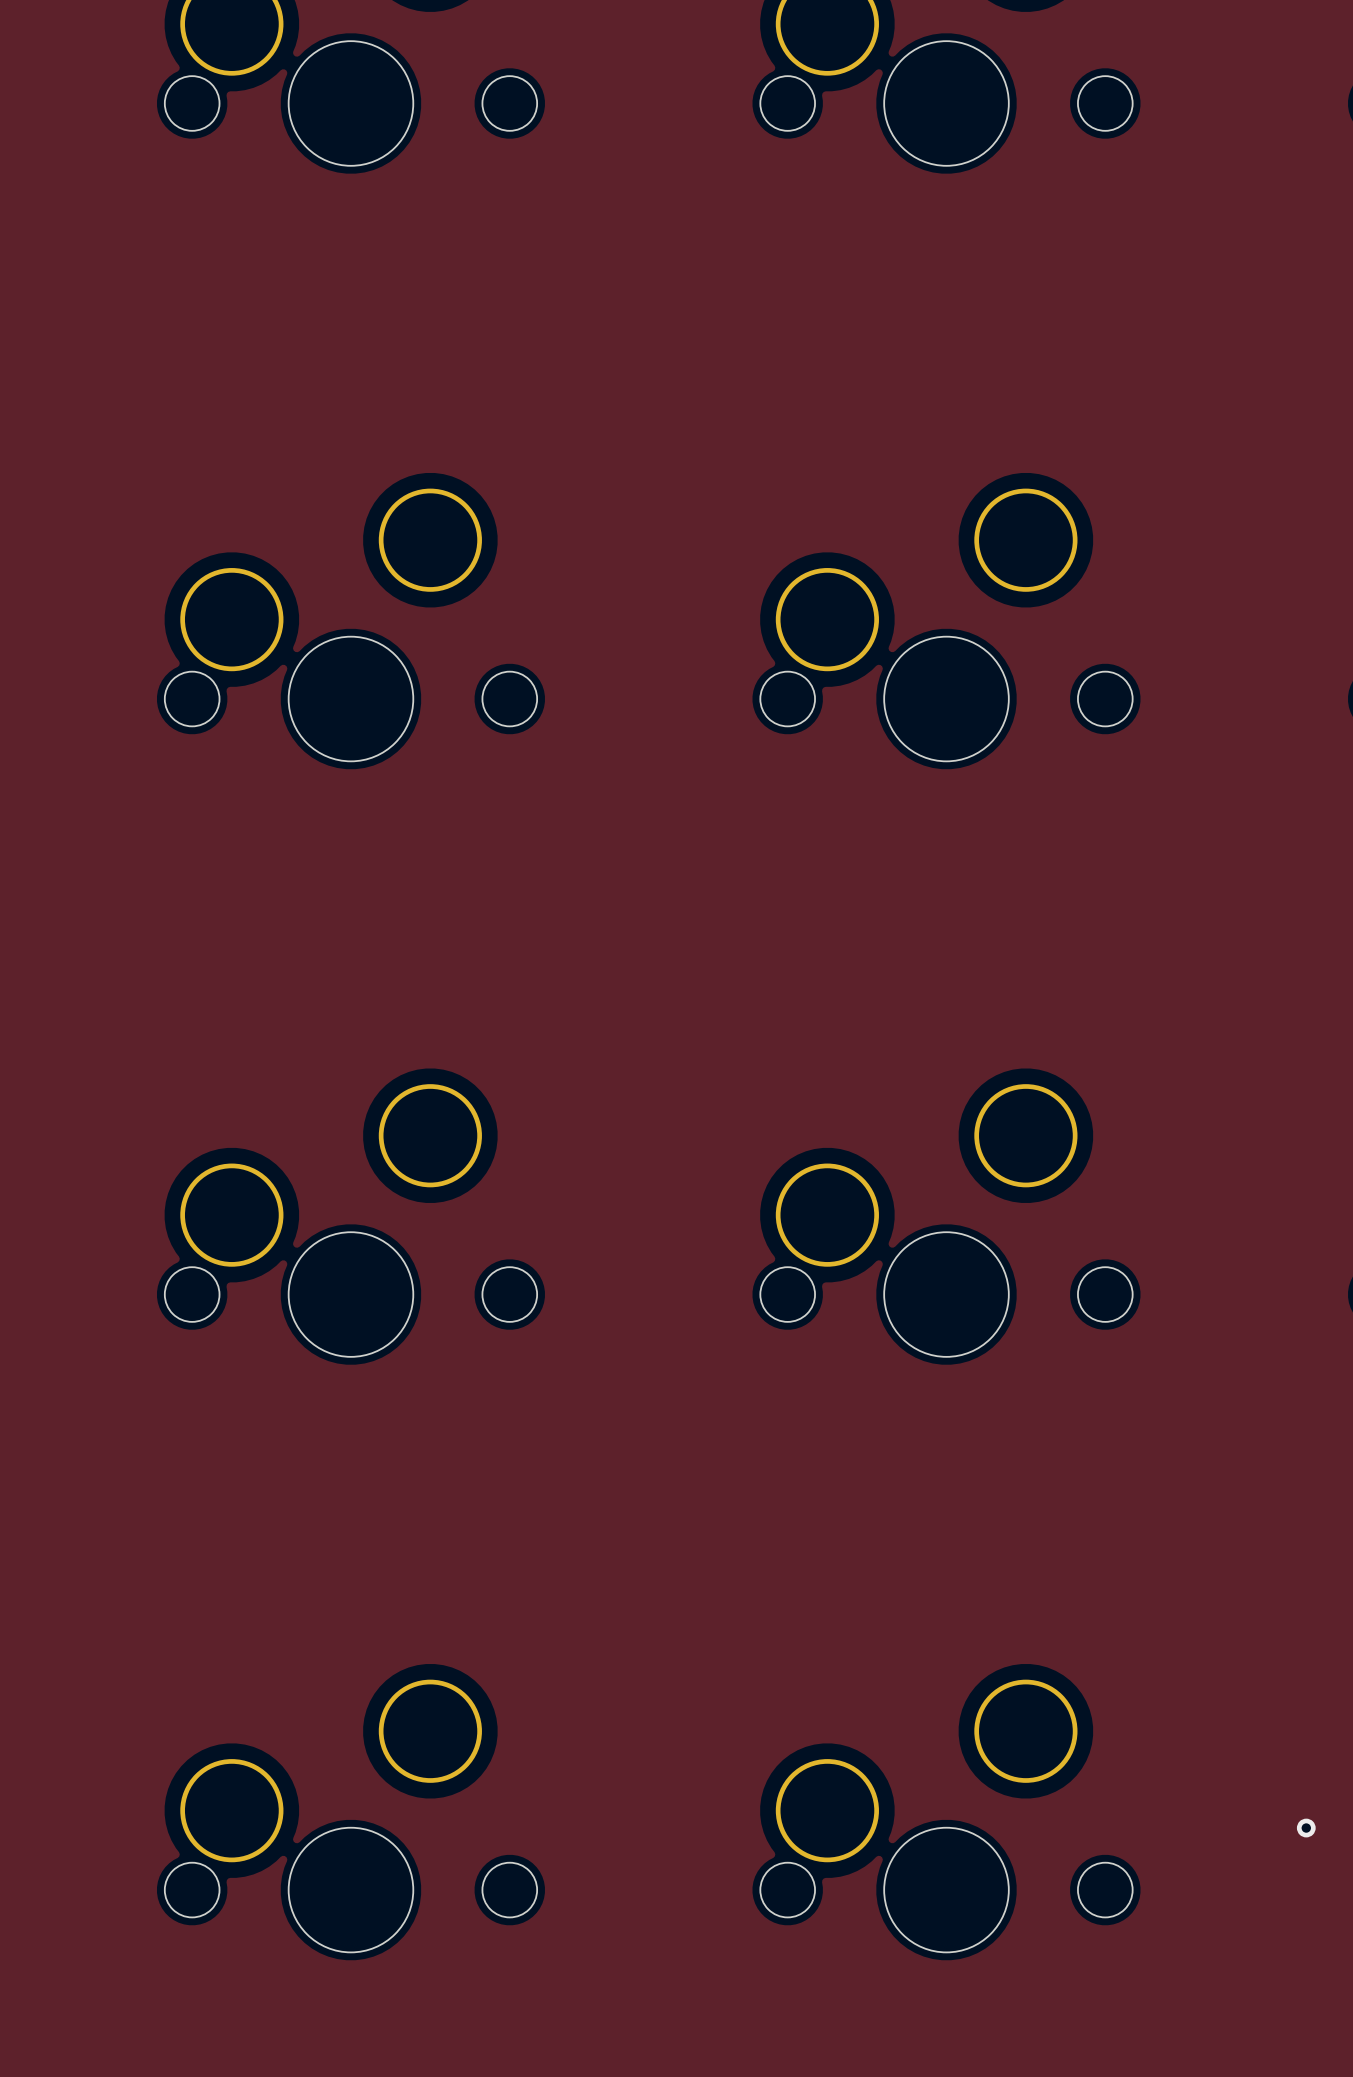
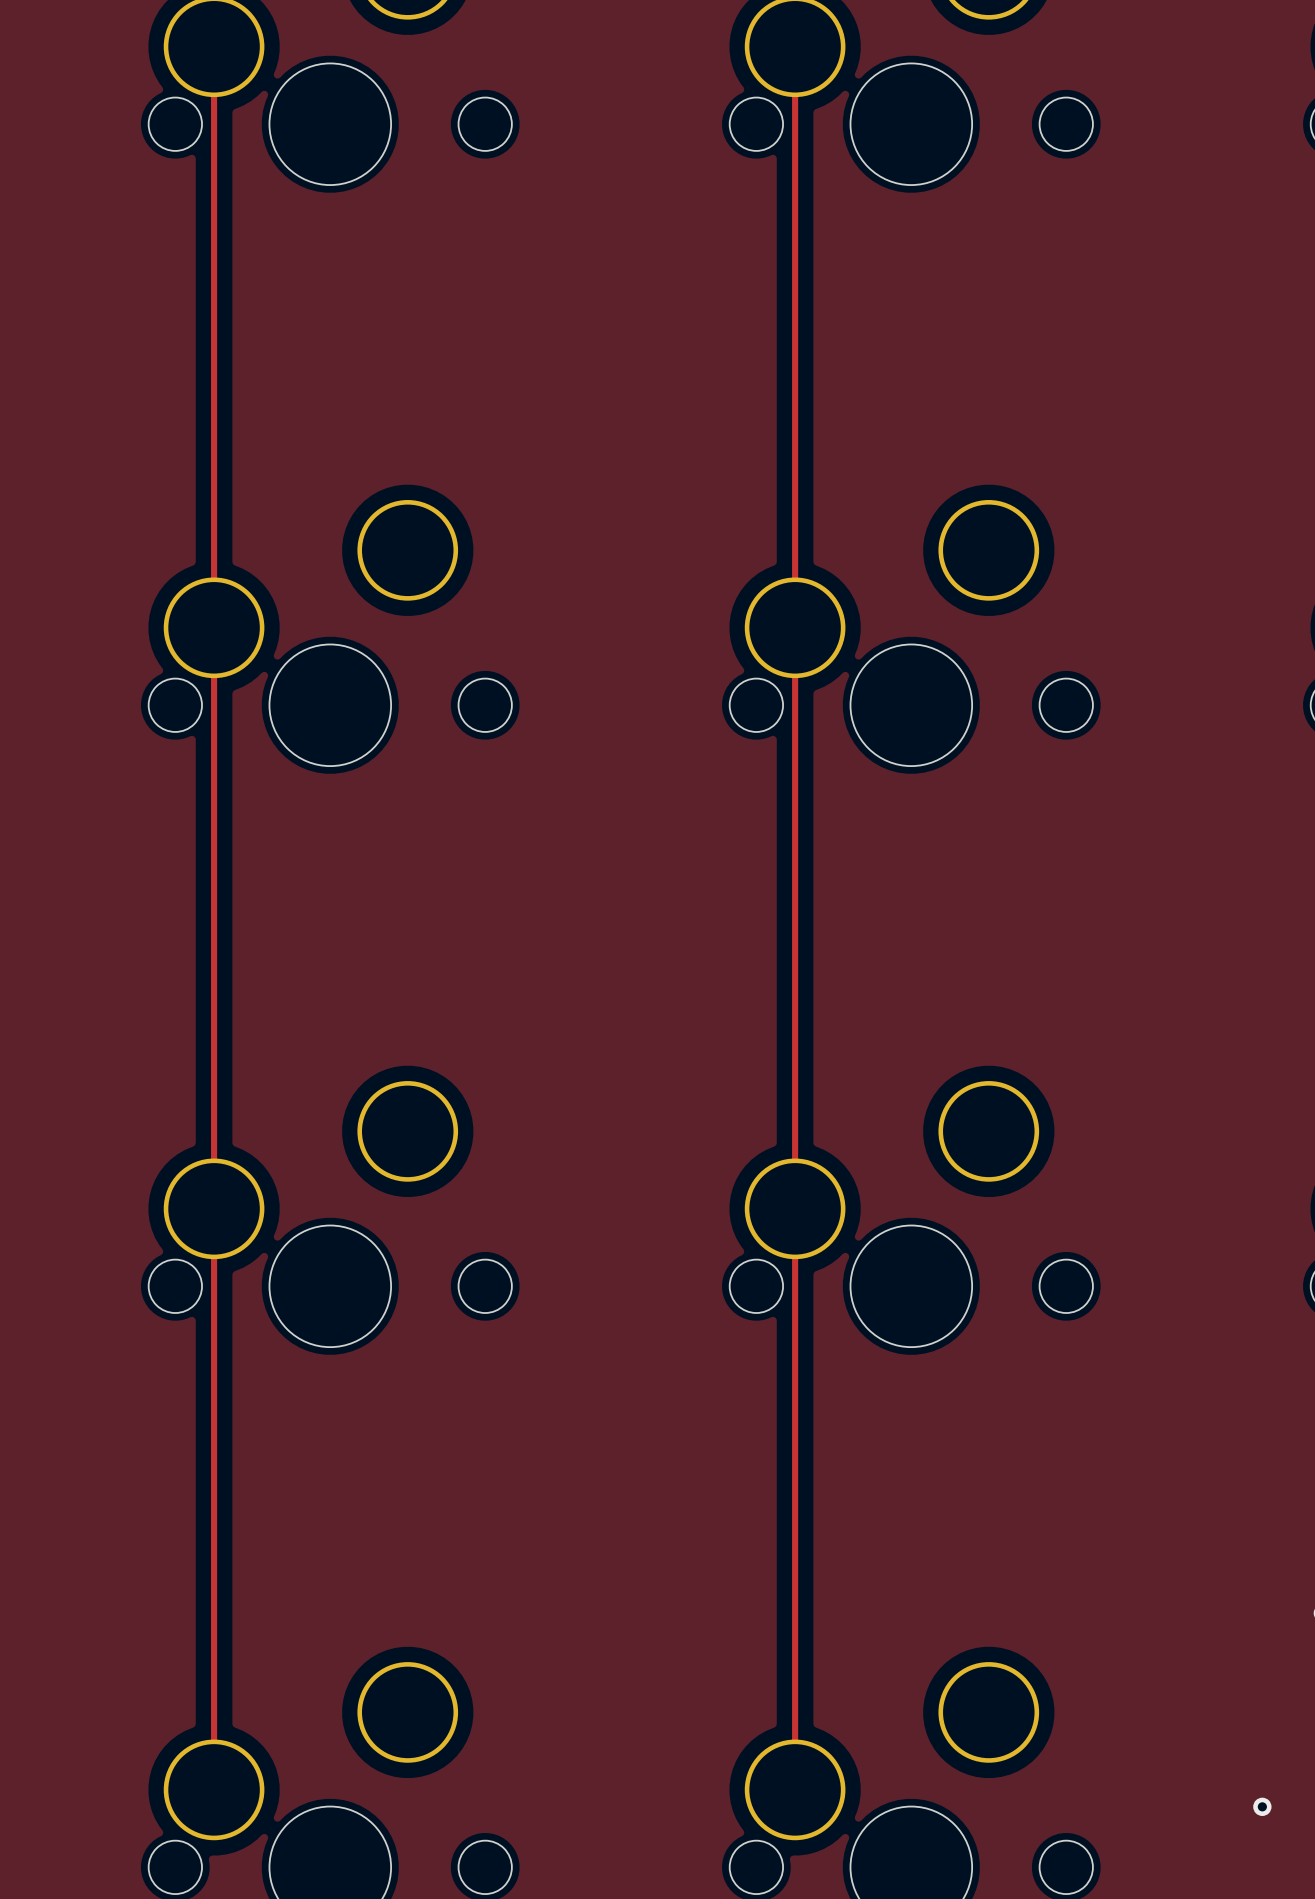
track: none -> (214, 46) (214, 1789)
track: none -> (795, 46) (795, 1789)

